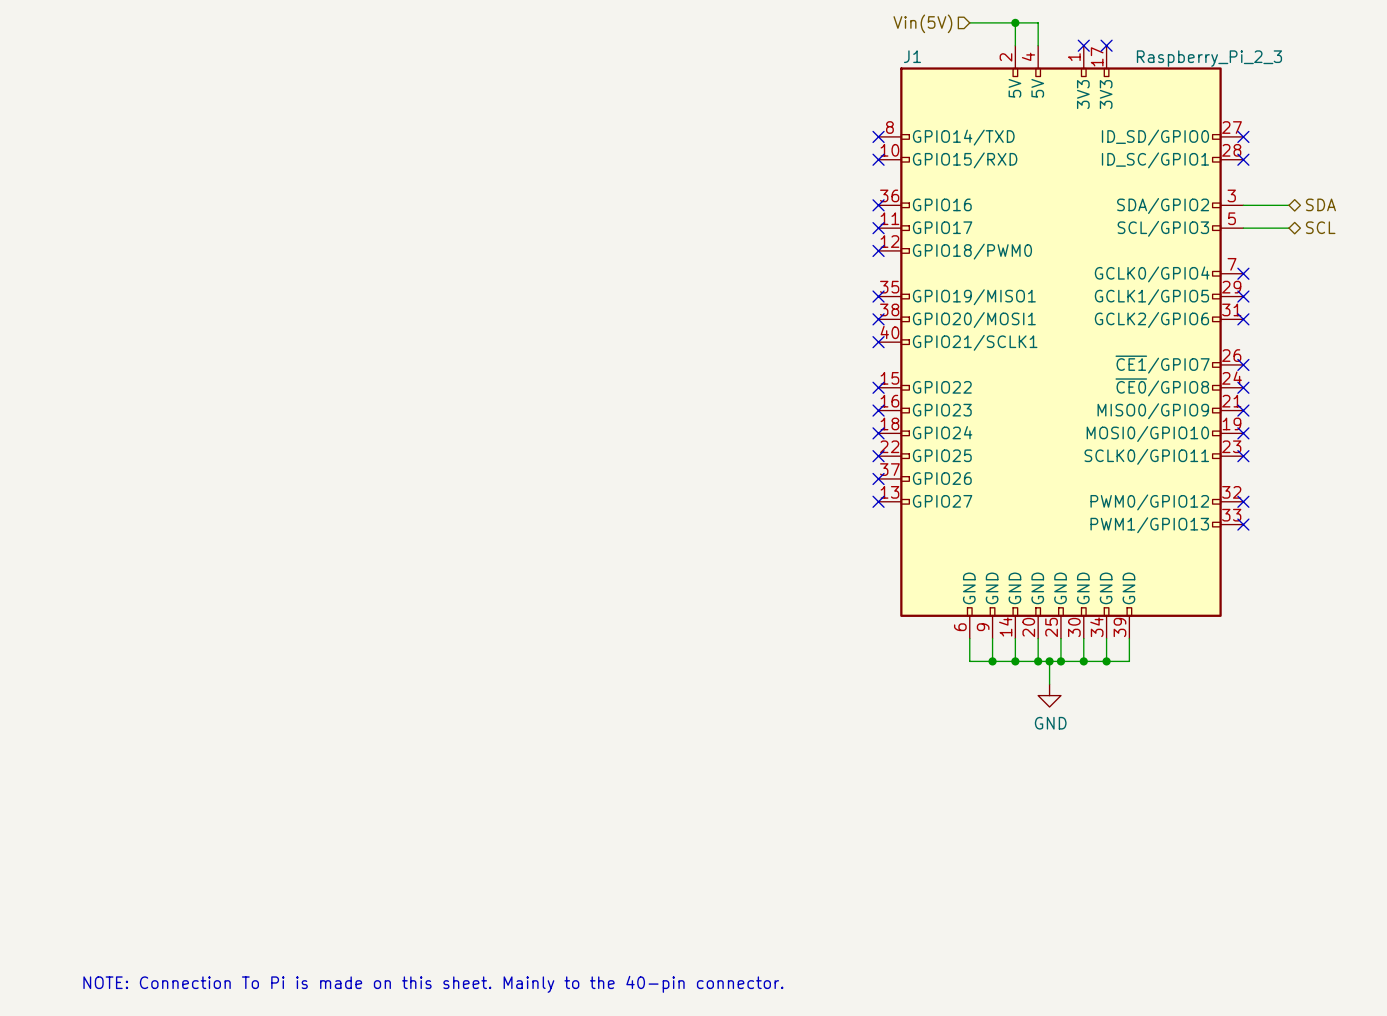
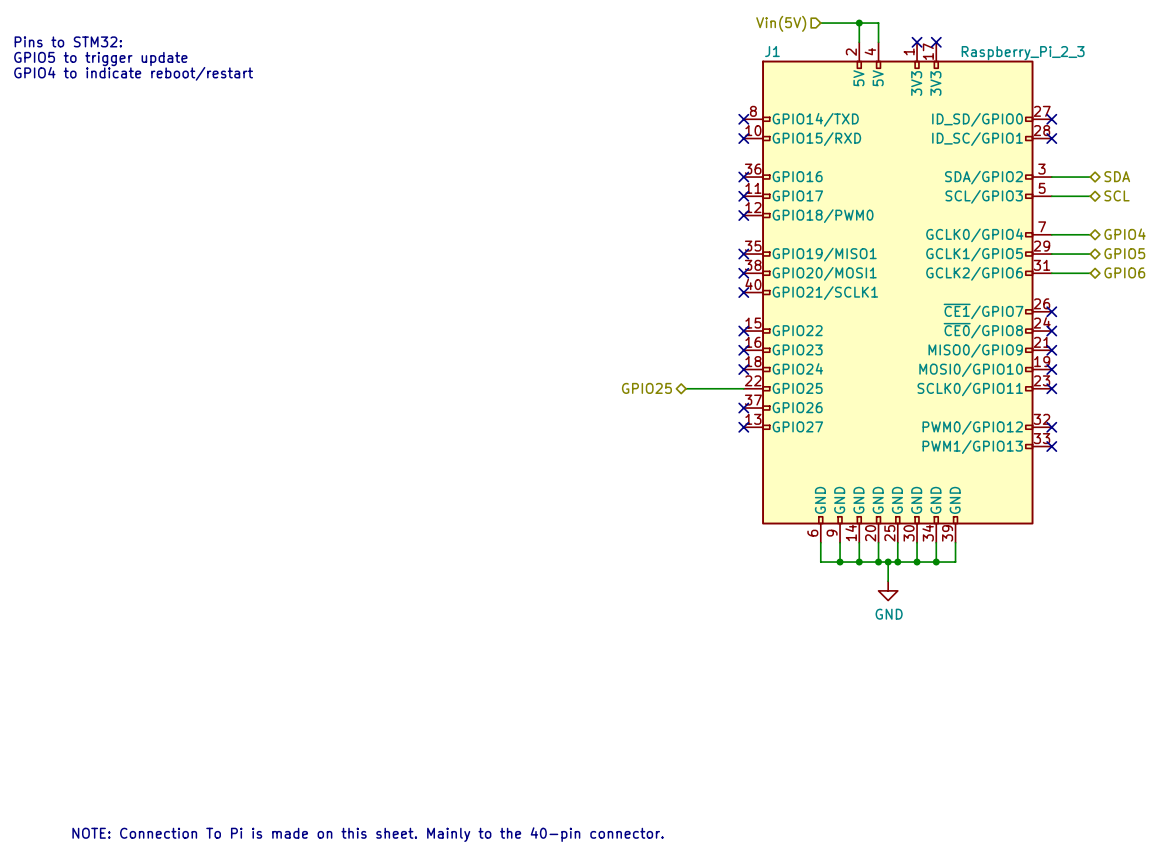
text: none -> Pins to STM32: (68, 41)
text: none -> GPIO5 to trigger update (100, 59)
text: none -> GPIO4 to indicate reboot/restart (133, 73)
wire: none -> (1051, 234) (1090, 234)
no-connect mark: (1243, 273) -> none
hierarchical label: none -> GPIO4 (1125, 234)
wire: none -> (1051, 254) (1090, 254)
no-connect mark: (1243, 296) -> none
hierarchical label: none -> GPIO5 (1124, 253)
hierarchical label: none -> GPIO6 (1124, 272)
wire: none -> (1051, 273) (1090, 273)
no-connect mark: (1243, 319) -> none
hierarchical label: none -> GPIO25 (646, 388)
wire: none -> (686, 388) (743, 388)
no-connect mark: (878, 456) -> none

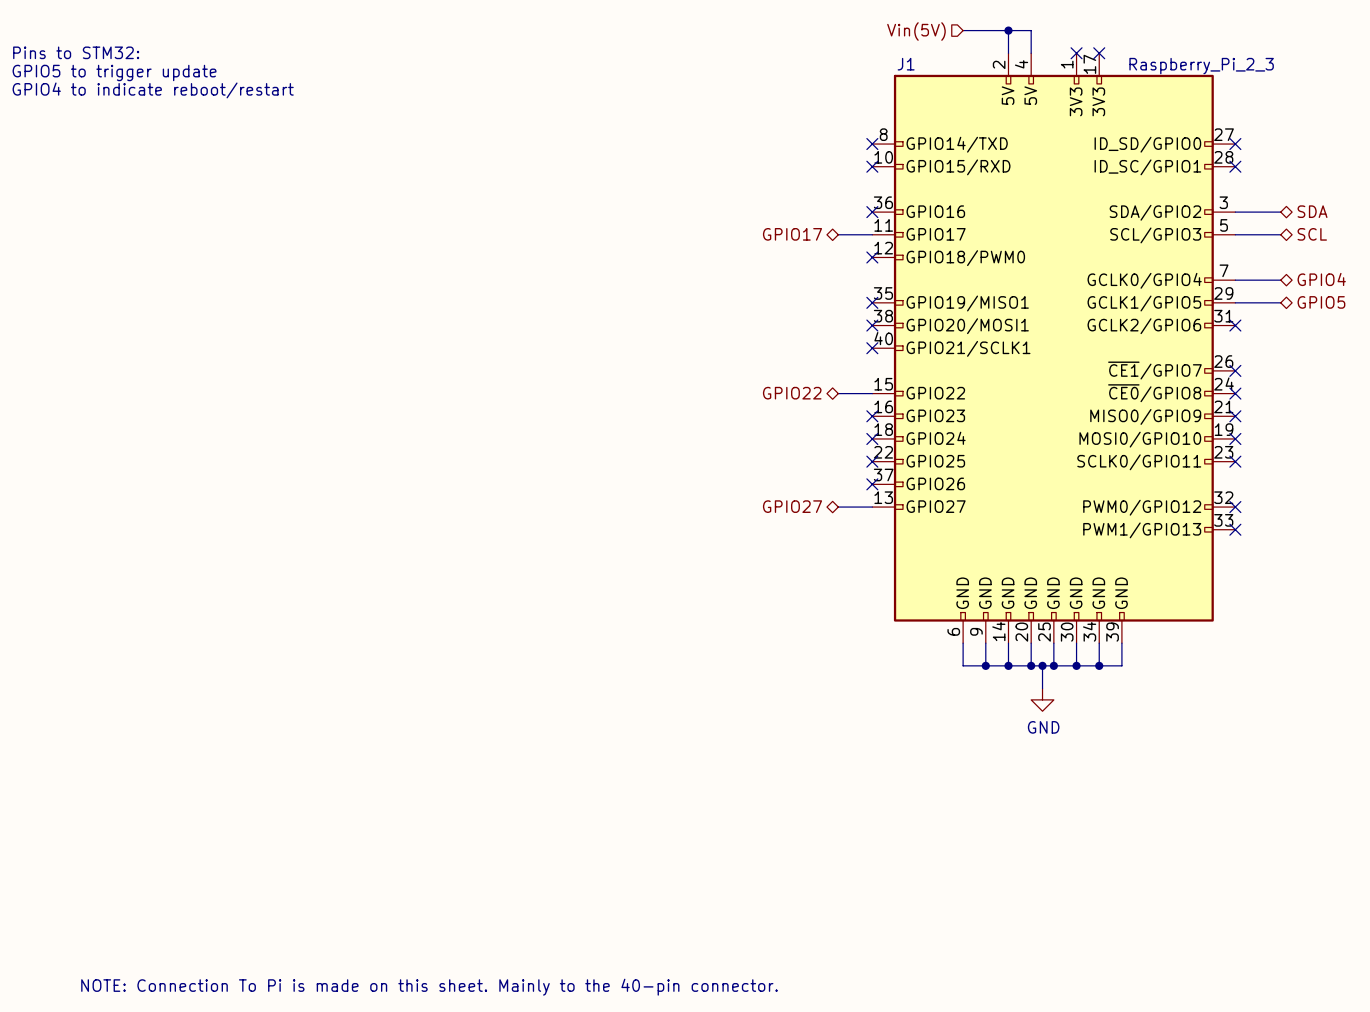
hierarchical label: none -> GPIO17 (792, 234)
wire: none -> (838, 234) (872, 234)
no-connect mark: (743, 196) -> none
hierarchical label: GPIO6 (1124, 272) -> none
wire: (1051, 273) (1090, 273) -> none
no-connect mark: none -> (1235, 325)
hierarchical label: none -> GPIO22 (792, 393)
wire: none -> (838, 393) (872, 393)
no-connect mark: (743, 331) -> none
hierarchical label: GPIO25 (646, 388) -> none
wire: (686, 388) (743, 388) -> none
no-connect mark: none -> (872, 461)
hierarchical label: none -> GPIO27 (792, 506)
wire: none -> (838, 507) (872, 507)
no-connect mark: (743, 427) -> none

